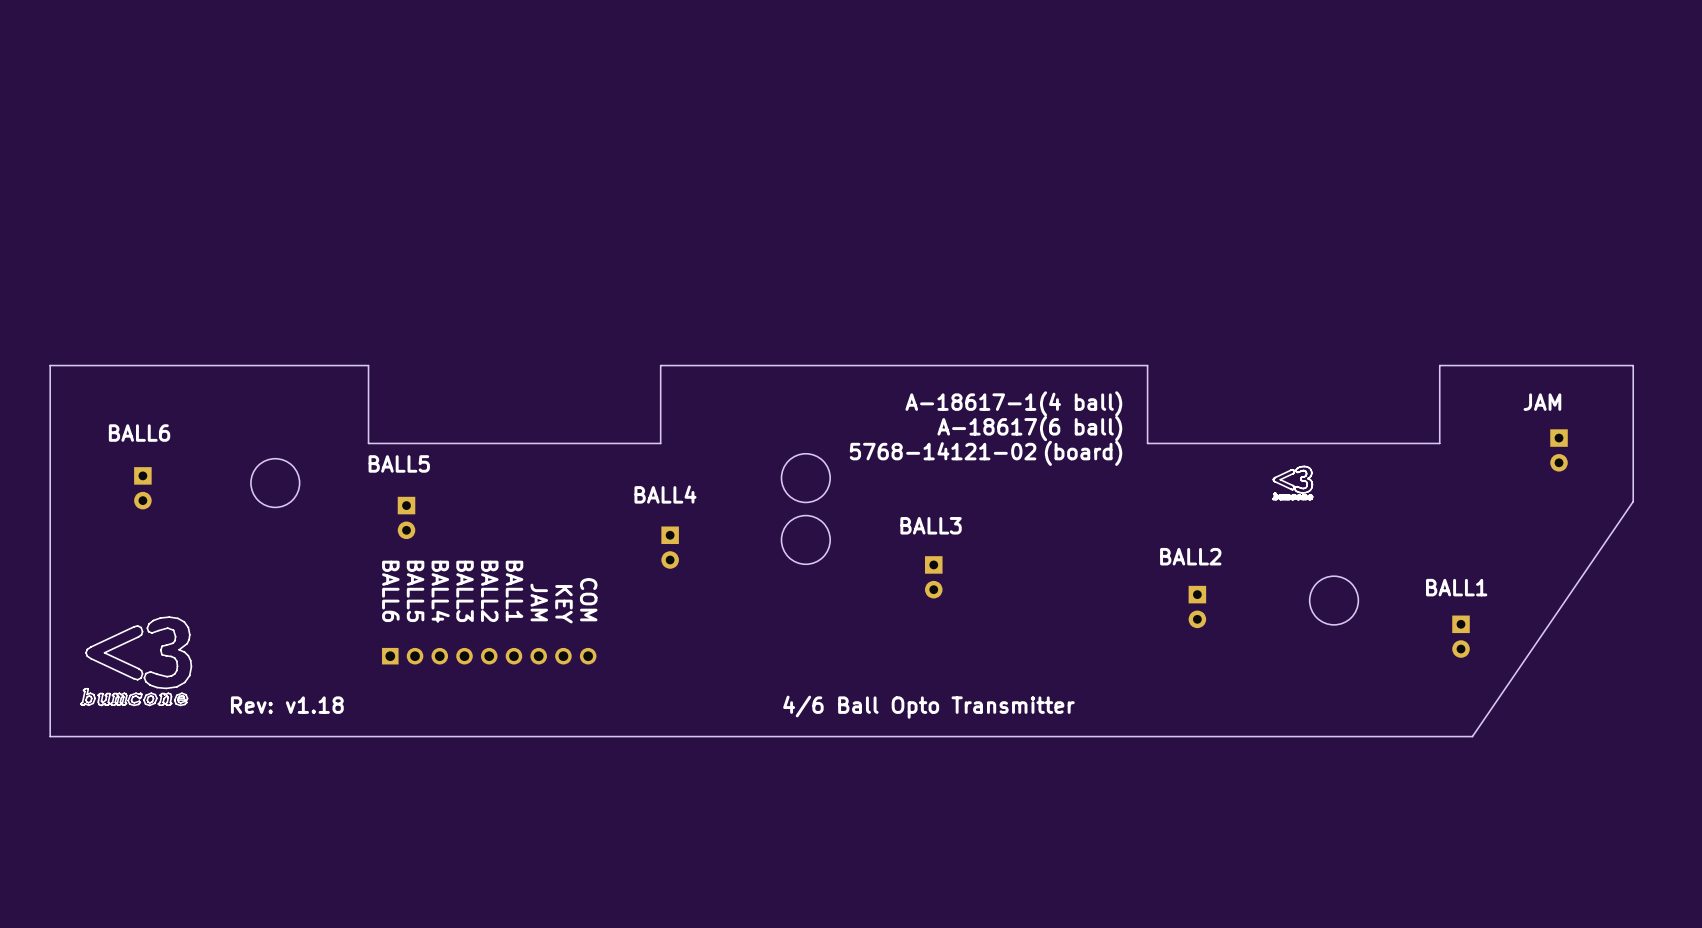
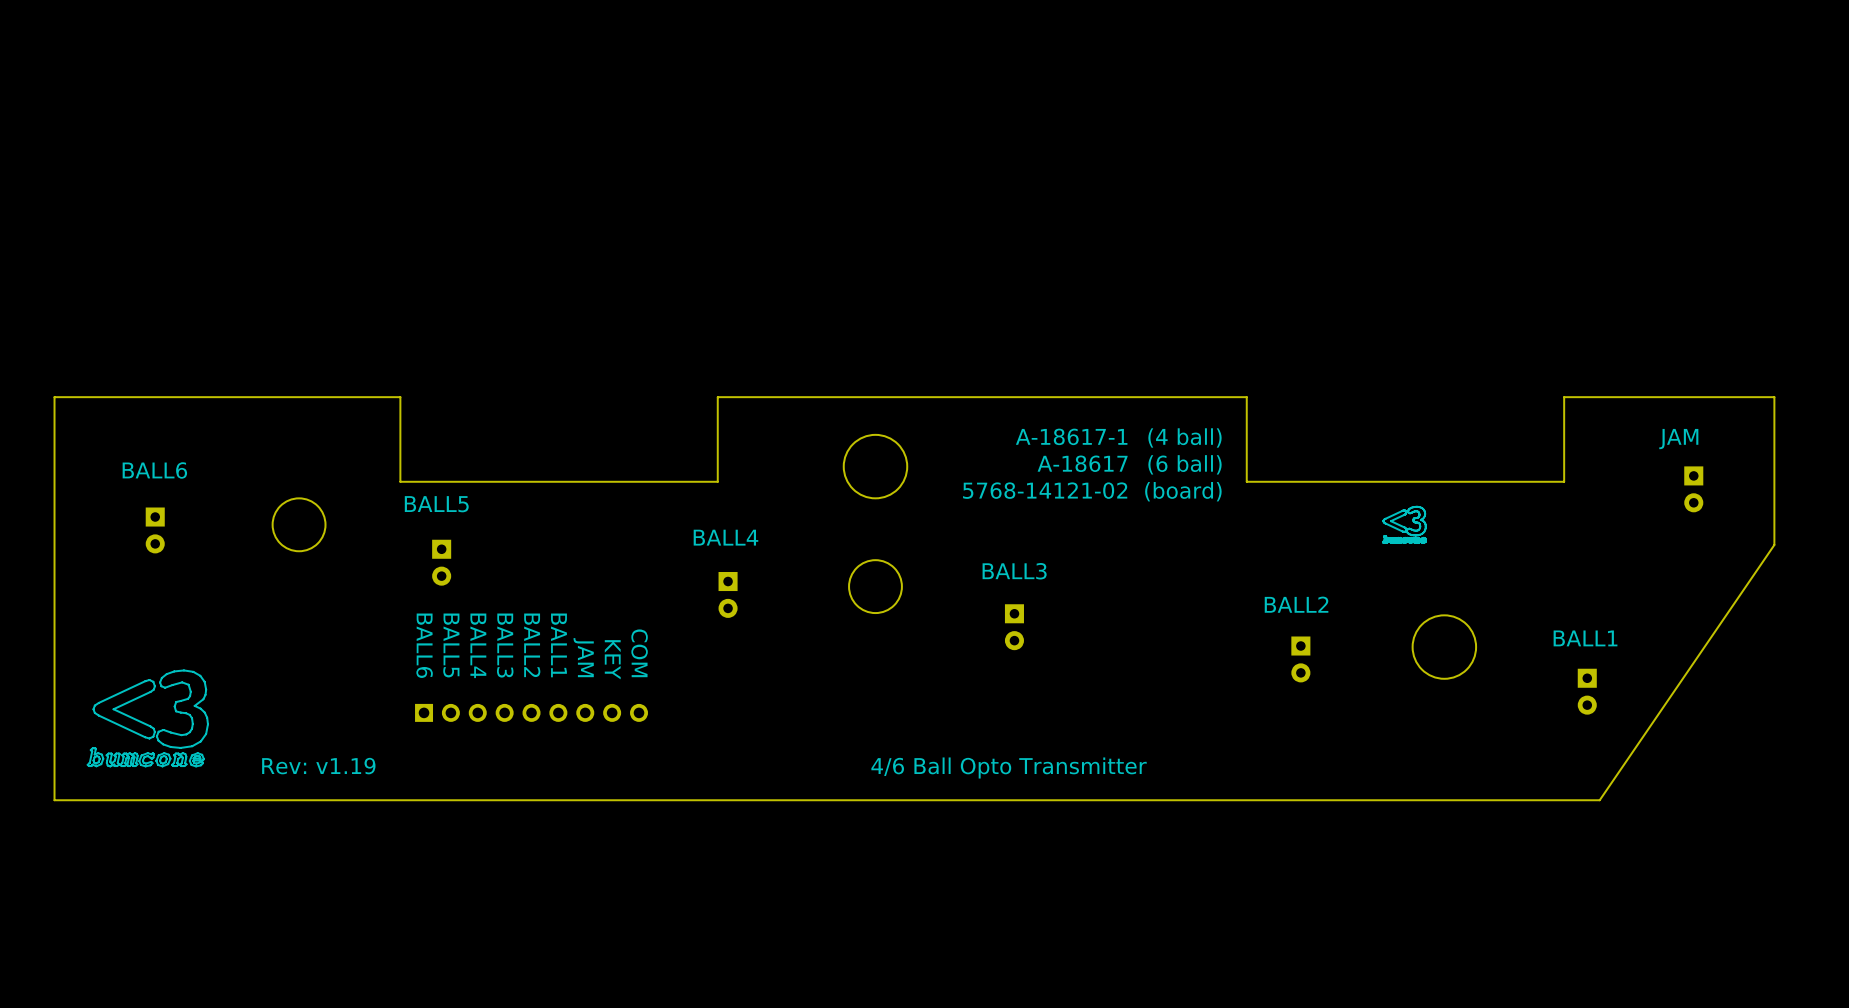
round board edge: none -> [842, 434, 909, 500]
round board edge: [780, 453, 831, 504] -> none
round board edge size: [1308, 575, 1360, 626] -> [1411, 614, 1477, 680]
text: Rev: v1.18 (287, 705) -> Rev: v1.19 (318, 766)

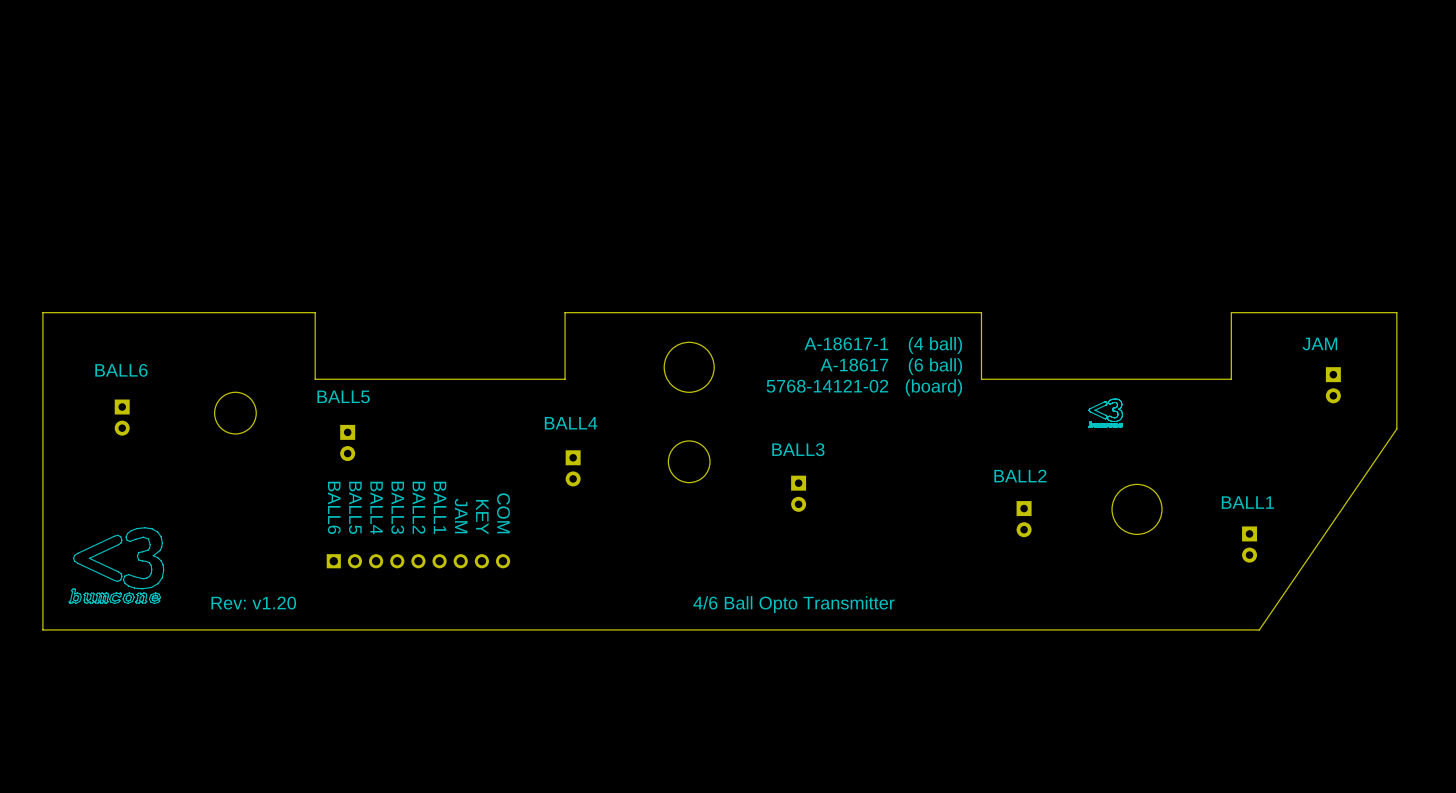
text: Rev: v1.19 (318, 766) -> Rev: v1.20 (253, 603)

